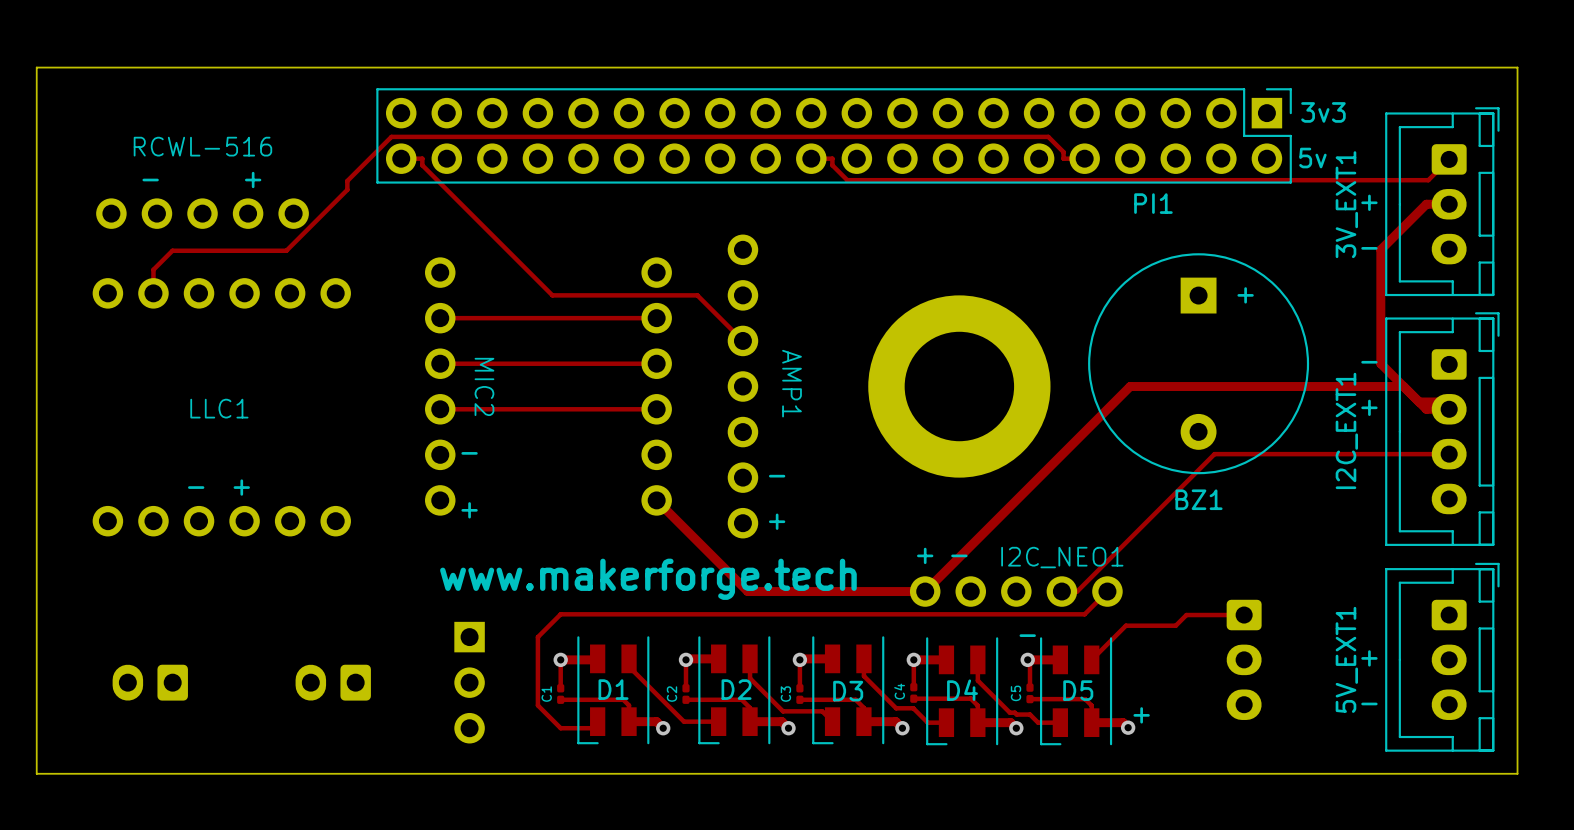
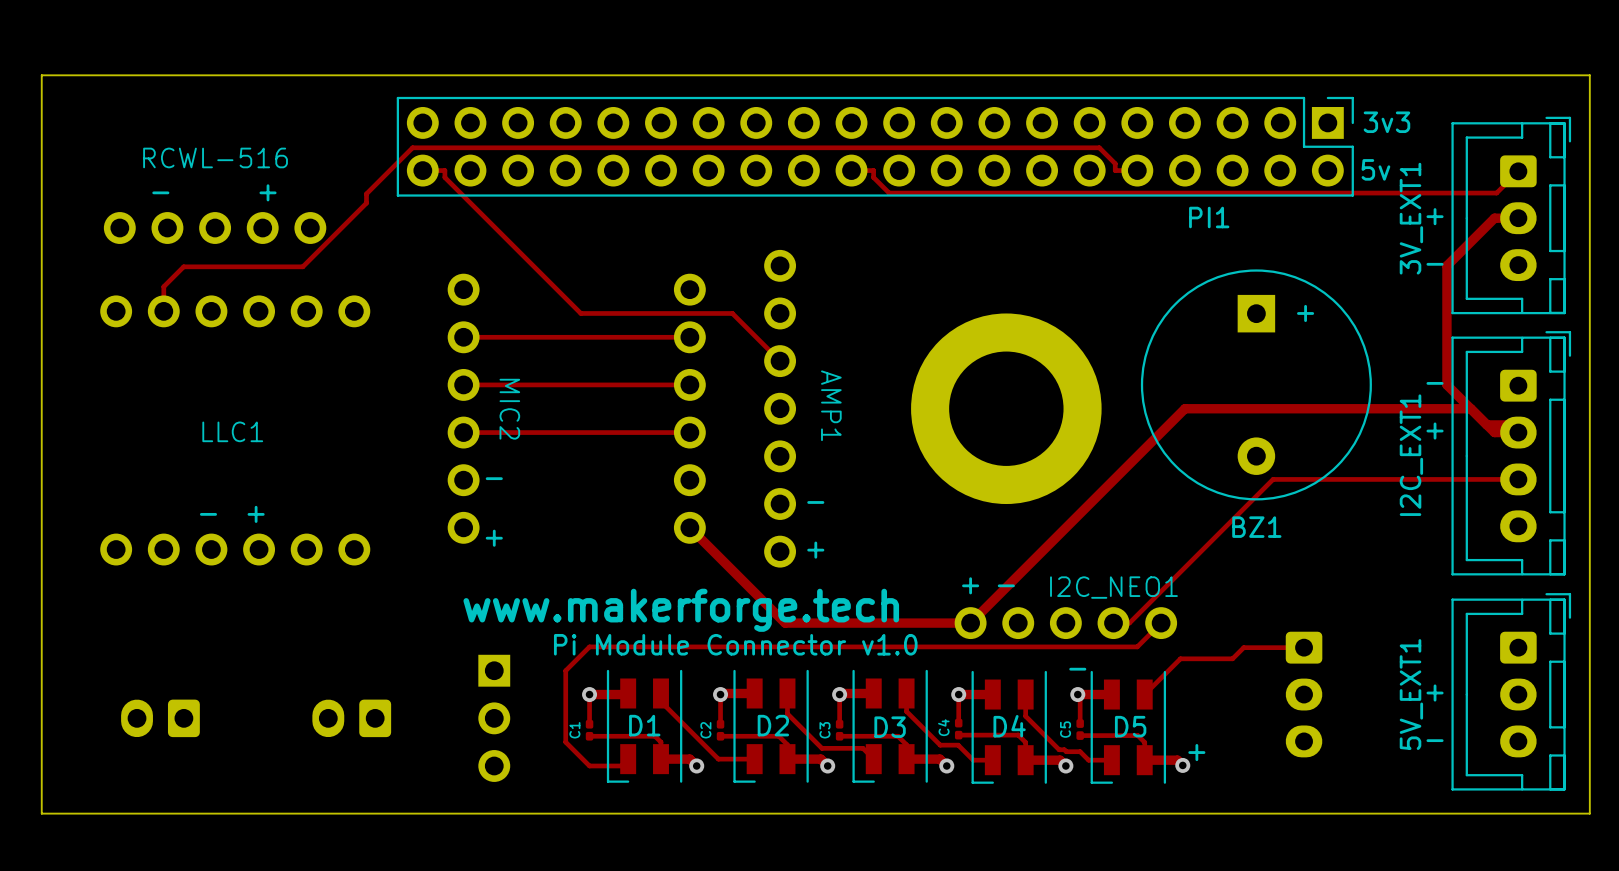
text: none -> Pi Module Connector v1.0 (735, 644)

